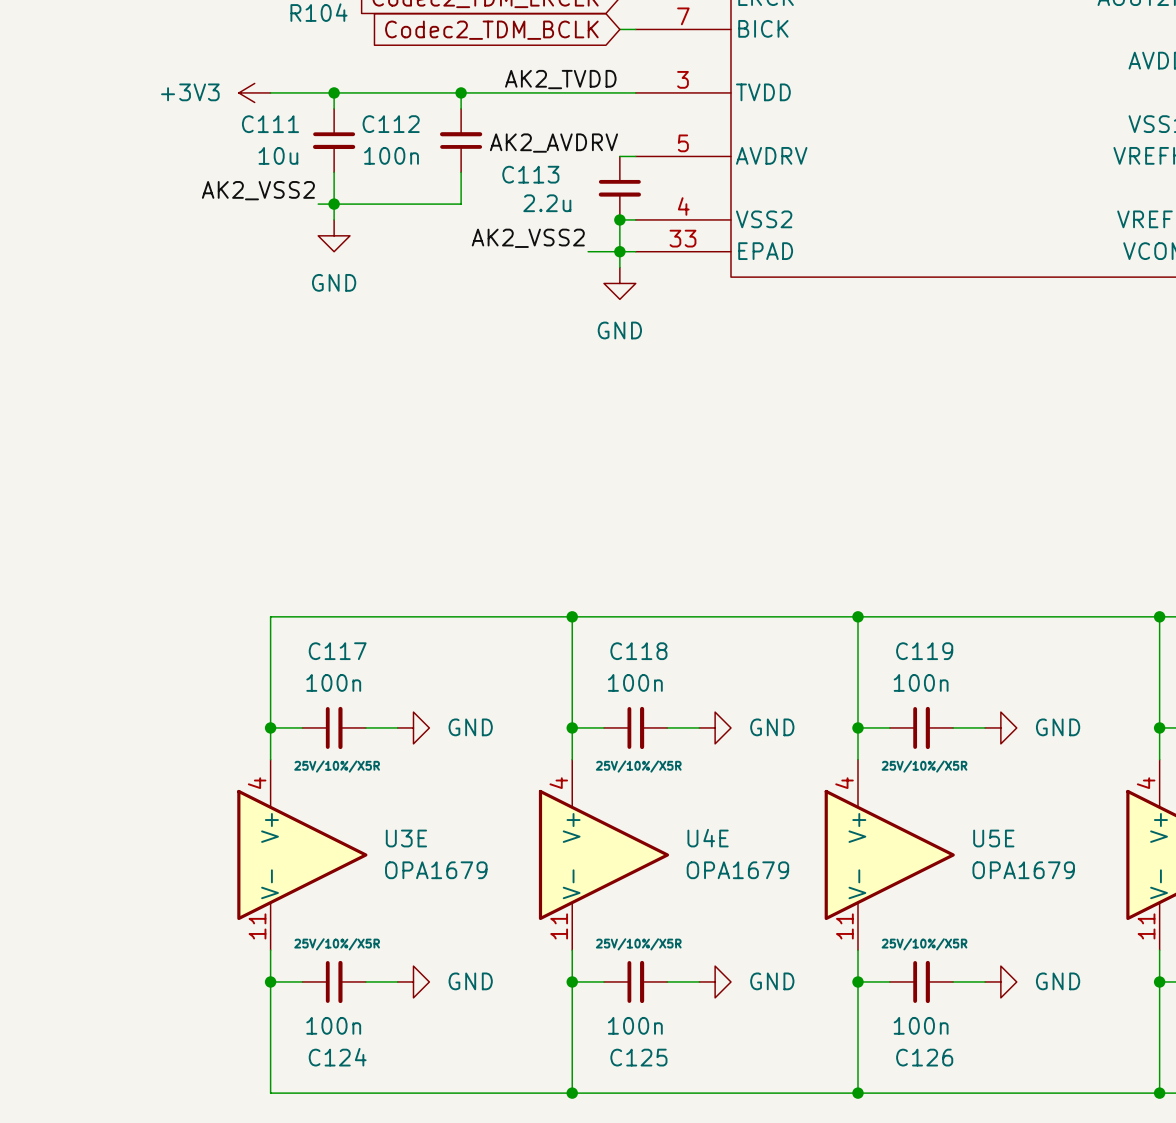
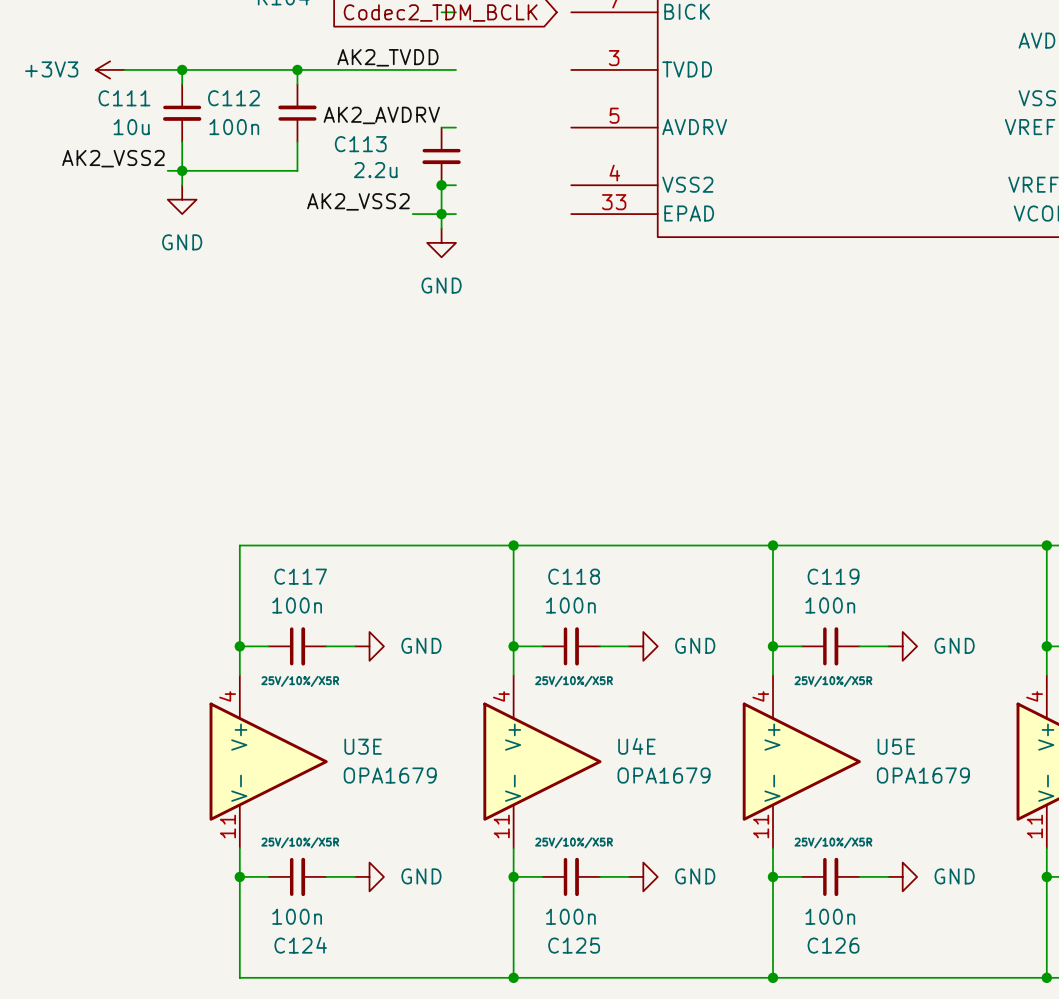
wire: (619, 29) (635, 29) -> (441, 12) (455, 12)
label position: AK2_TVDD (560, 79) -> AK2_TVDD (387, 57)
wire: none -> (124, 69) (239, 69)
junction: none -> (182, 69)
power symbol position: +3V3 (254, 92) -> +3V3 (110, 69)
wire: (461, 92) (461, 108) -> (182, 69) (182, 84)
junction: (461, 92) -> none
wire: (508, 92) (635, 92) -> none
C111 position: (334, 140) -> (182, 113)
C112 position: (461, 140) -> (297, 113)
label position: AK2_AVDRV (553, 143) -> AK2_AVDRV (381, 115)
wire: (619, 156) (635, 156) -> (441, 127) (455, 127)
wire: none -> (182, 142) (182, 185)
wire: (461, 172) (461, 204) (334, 204) (334, 219) -> none
C113 position: (619, 188) -> (441, 156)
label position: AK2_VSS2 (258, 190) -> AK2_VSS2 (113, 158)
wire: none -> (167, 170) (283, 170)
junction: none -> (182, 170)
junction: (334, 204) -> none
junction: none -> (441, 185)
junction: (619, 219) -> none
wire: (635, 219) (619, 219) (619, 267) -> (455, 185) (441, 185) (441, 228)
power symbol: none -> GND (182, 199)
power symbol: GND (334, 235) -> none
label position: AK2_VSS2 (528, 238) -> AK2_VSS2 (358, 201)
junction: none -> (441, 214)
wire: (588, 251) (635, 251) -> (412, 214) (455, 214)
junction: (619, 251) -> none
power symbol: none -> GND (441, 242)
power symbol: GND (619, 283) -> none

